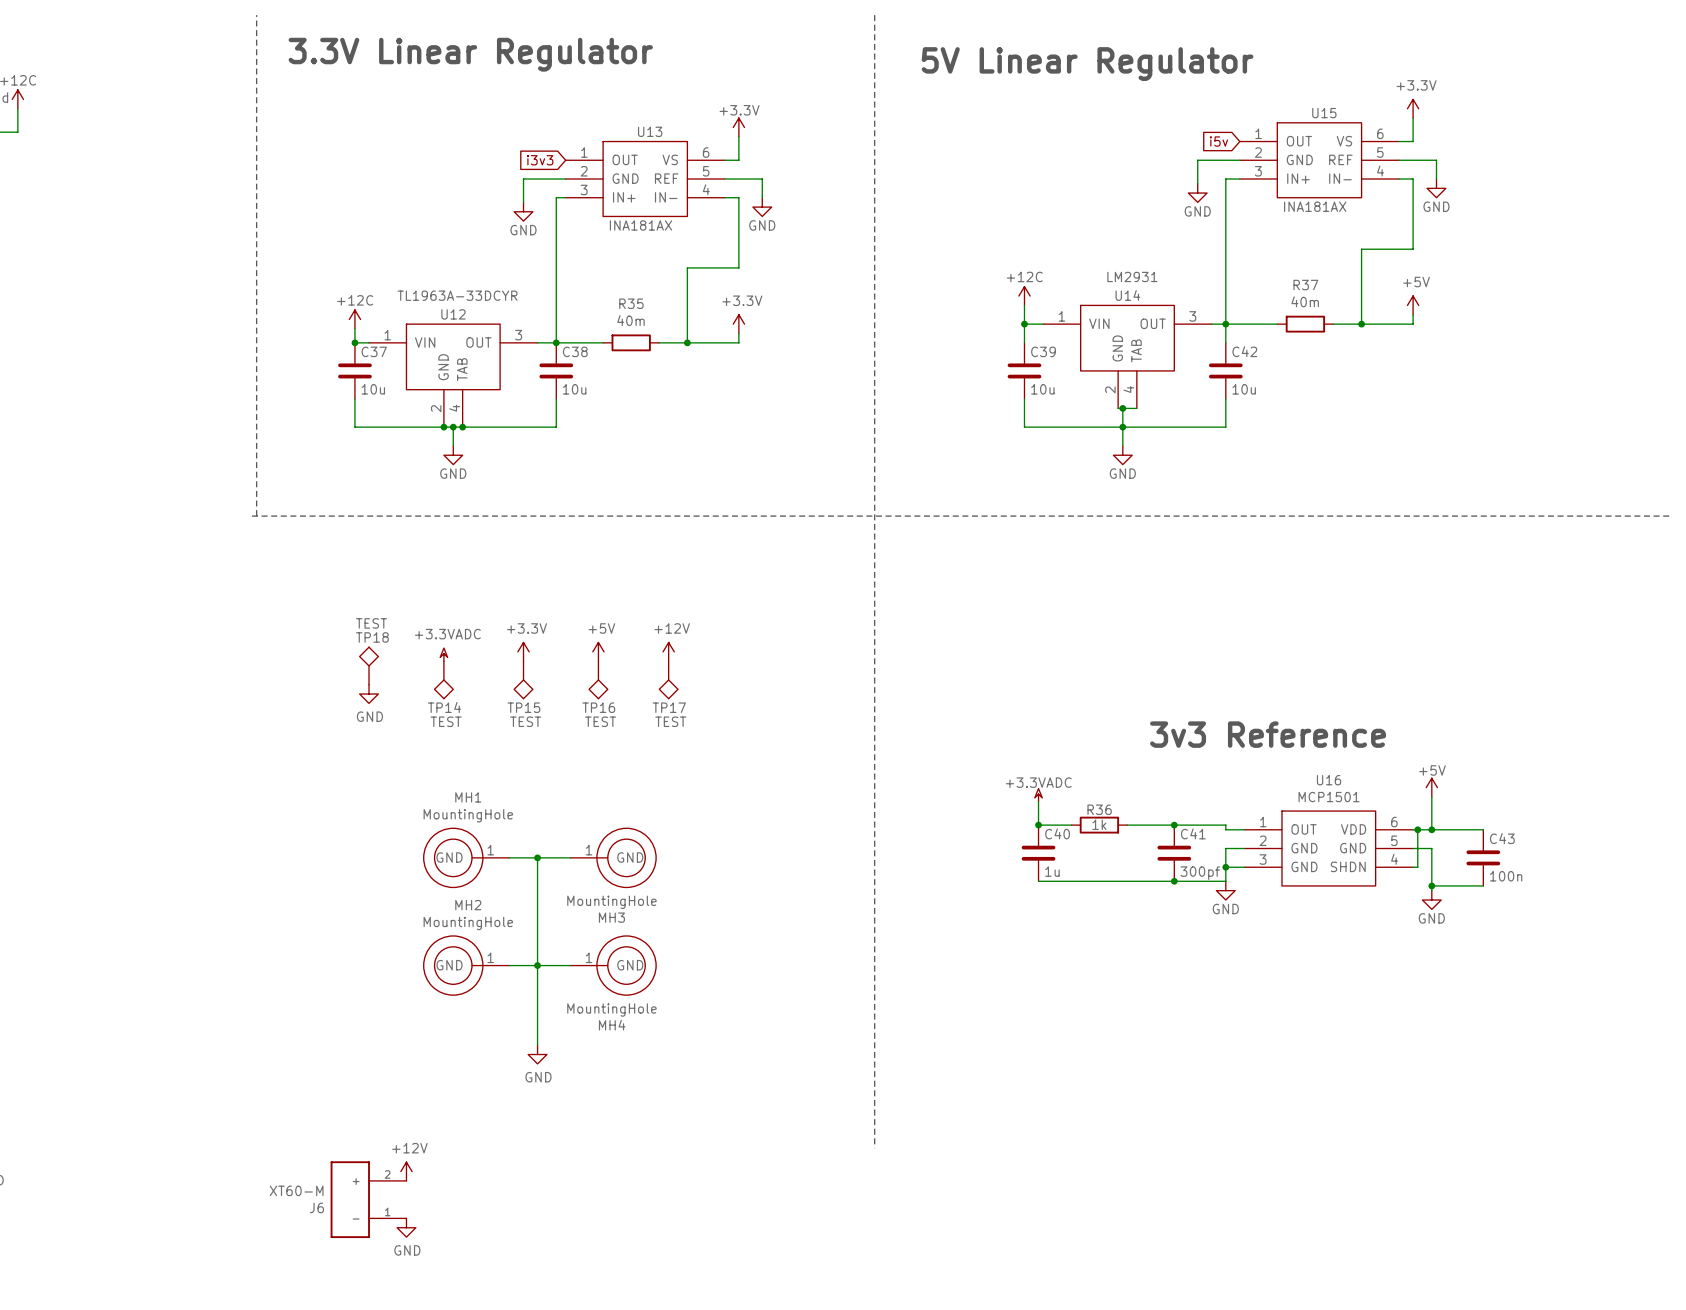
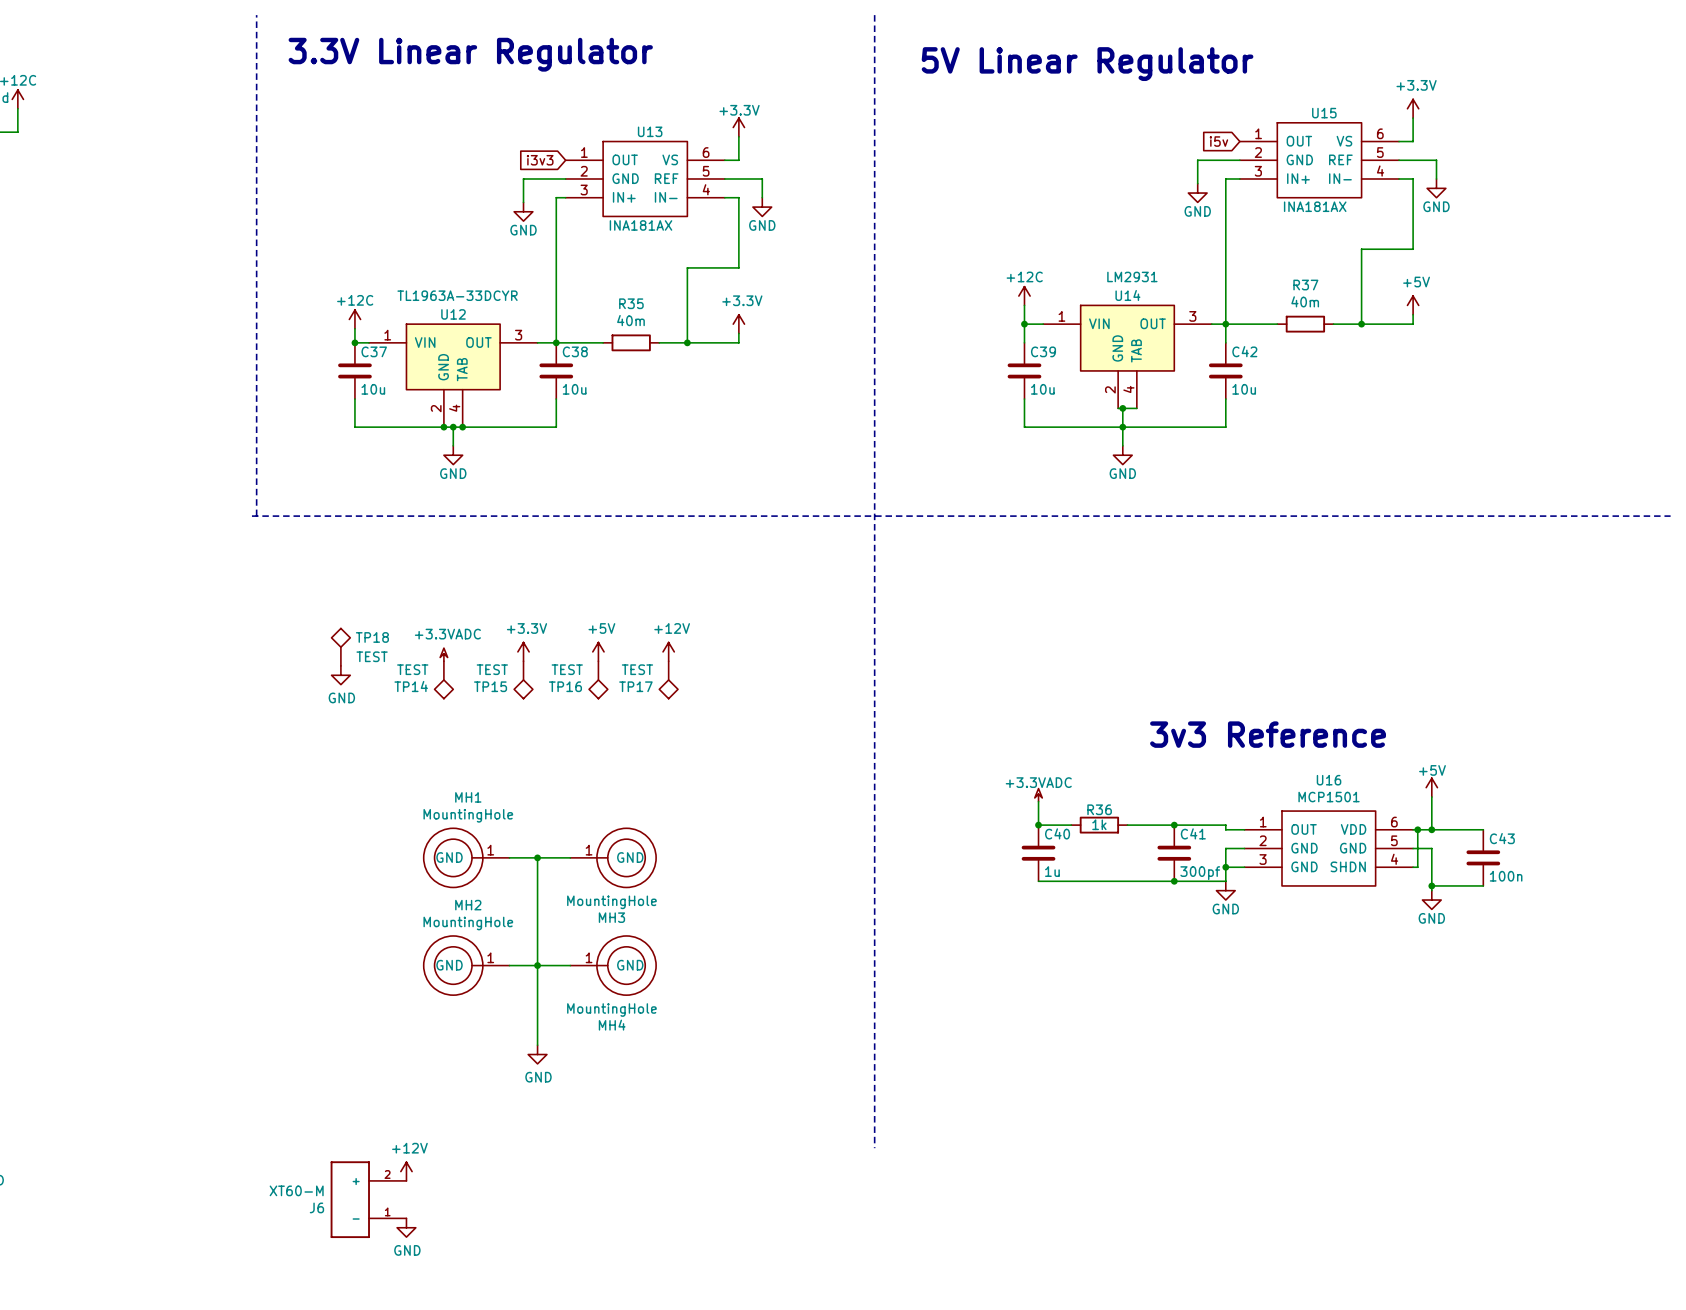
TP18 value position: TEST (371, 623) -> TEST (372, 656)
TP18 position: (369, 665) -> (340, 647)
power symbol position: GND (369, 694) -> GND (340, 675)
TP14 name position: TP14 (444, 707) -> TP14 (411, 686)
TP15 name position: TP15 (523, 707) -> TP15 (490, 686)
TP16 name position: TP16 (598, 707) -> TP16 (565, 686)
TP17 name position: TP17 (669, 707) -> TP17 (635, 686)
TP14 value position: TEST (446, 721) -> TEST (412, 669)
TP15 value position: TEST (525, 721) -> TEST (492, 669)
TP16 value position: TEST (600, 721) -> TEST (567, 669)
TP17 value position: TEST (670, 721) -> TEST (637, 669)

